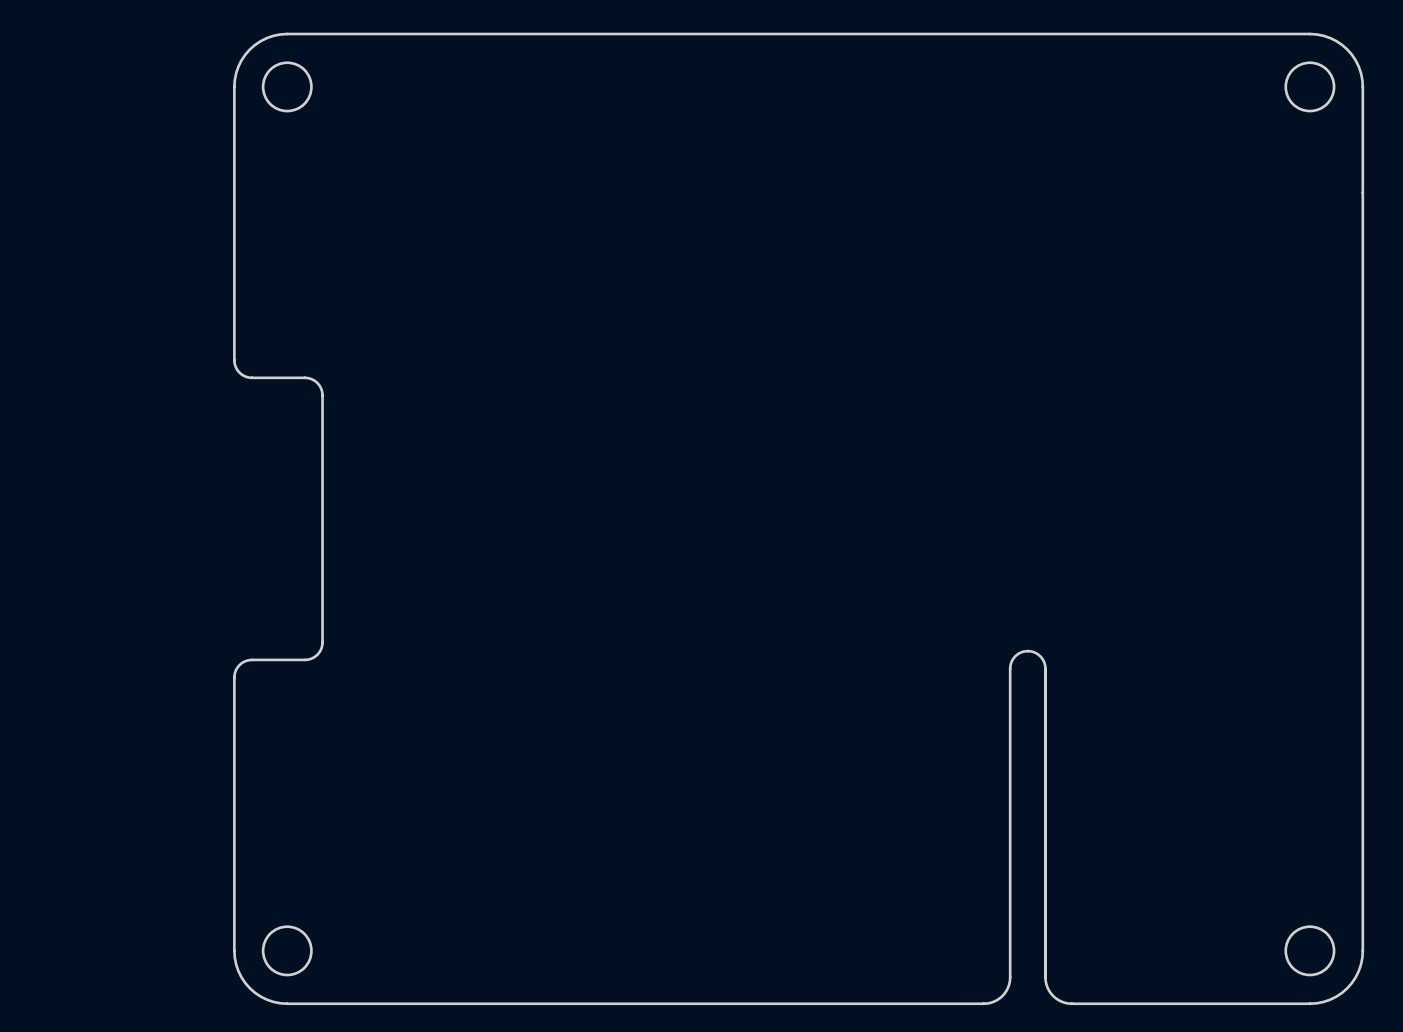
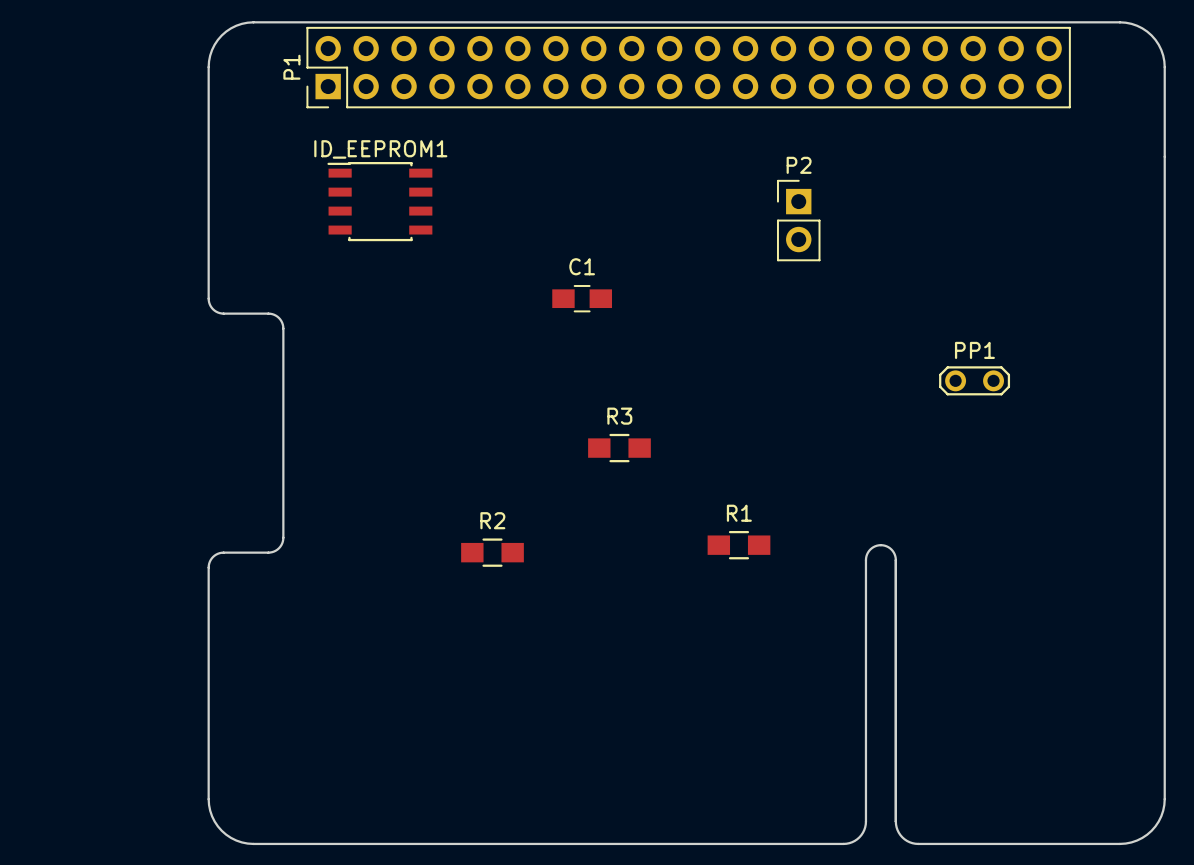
round board edge: [261, 61, 313, 113] -> none
round board edge: [1284, 61, 1336, 113] -> none
P1: none -> (688, 67)
ID_EEPROM1: none -> (379, 201)
P2: none -> (798, 220)
C1: none -> (582, 298)
PP1: none -> (974, 380)
R3: none -> (619, 448)
R1: none -> (738, 545)
R2: none -> (492, 552)
round board edge: [261, 925, 313, 977] -> none
round board edge: [1284, 925, 1336, 977] -> none

